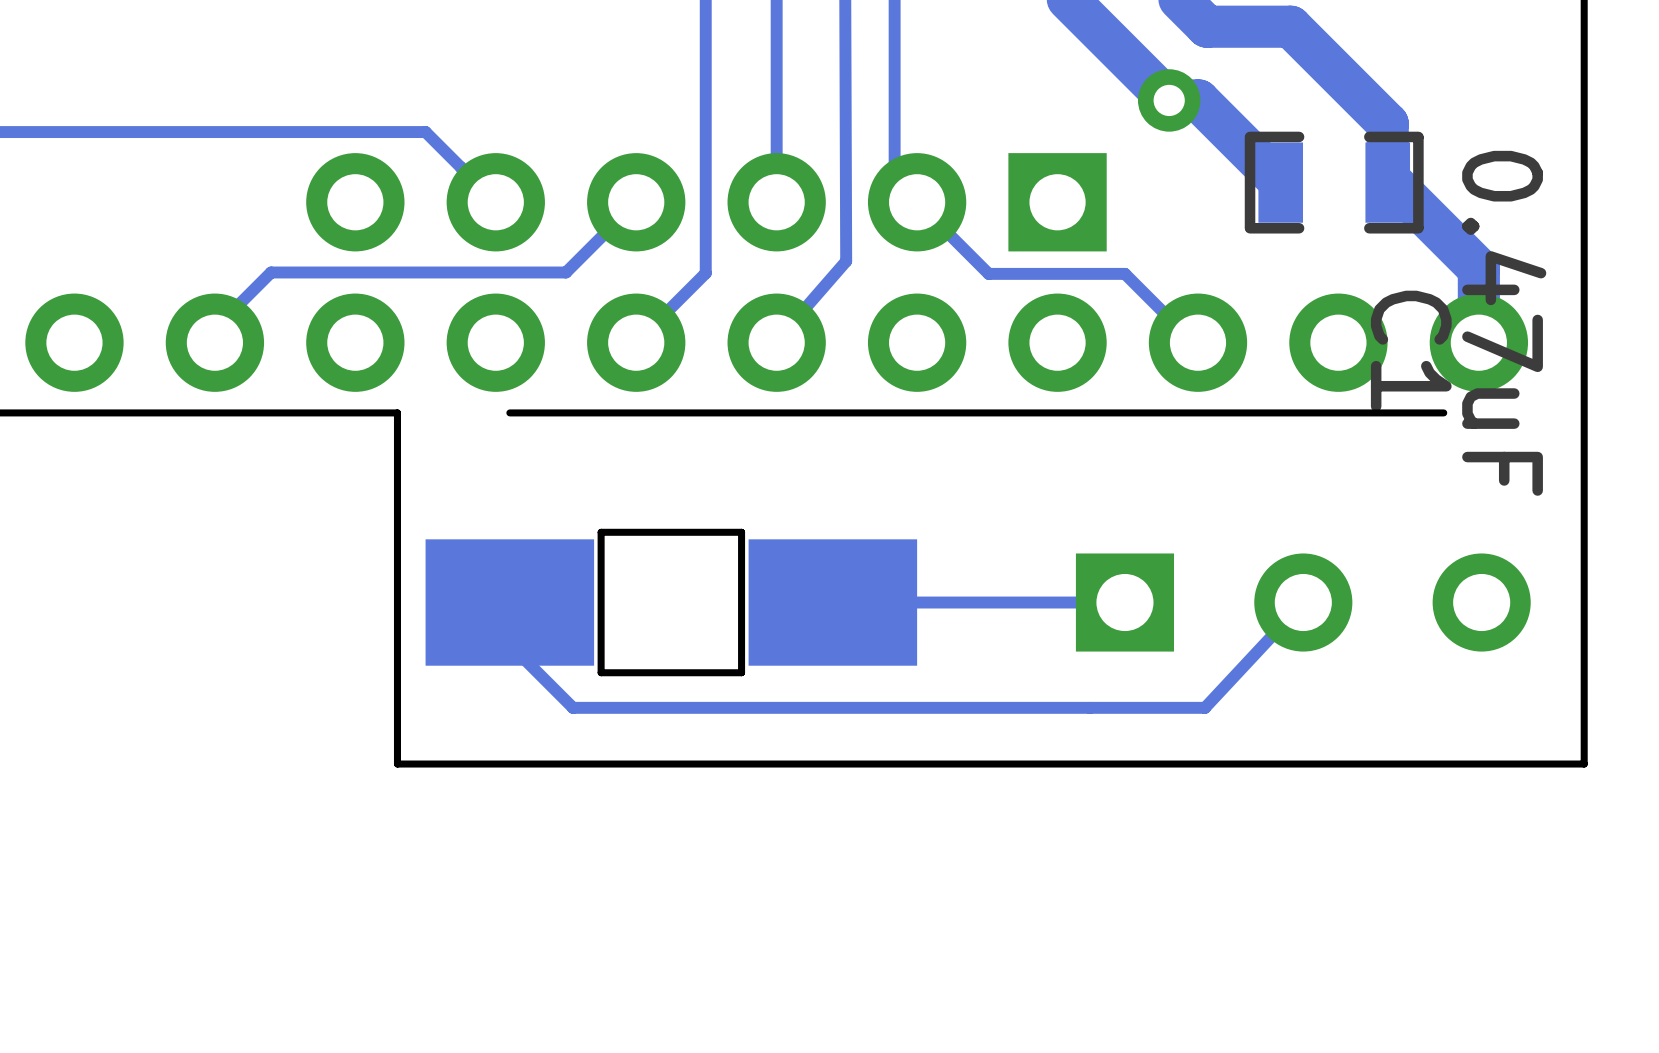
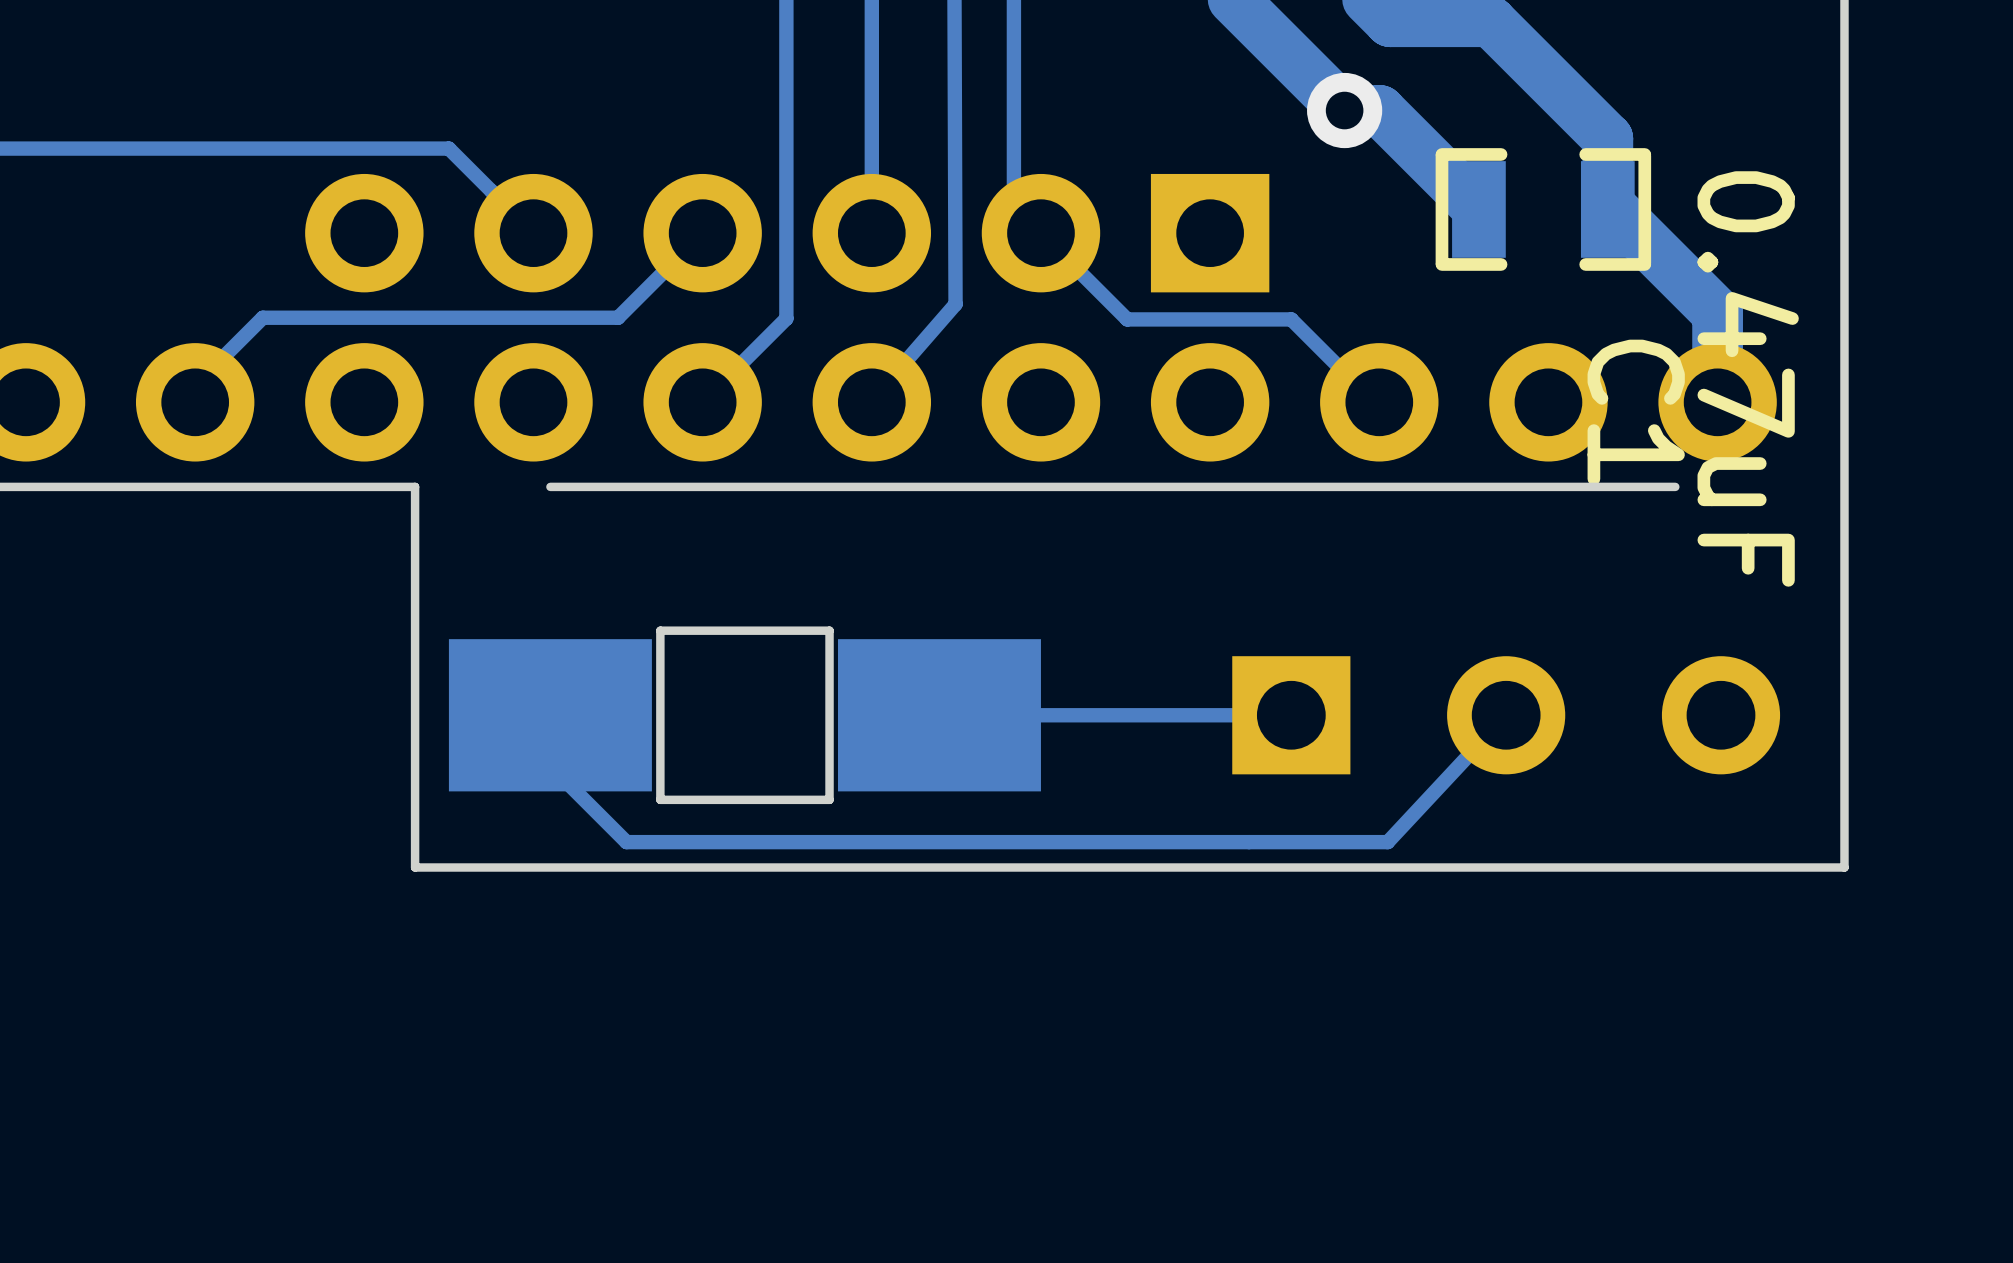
board edge: (1584, 728) (1584, 764) (397, 764) (397, 728) -> (1844, 867) (415, 867)

